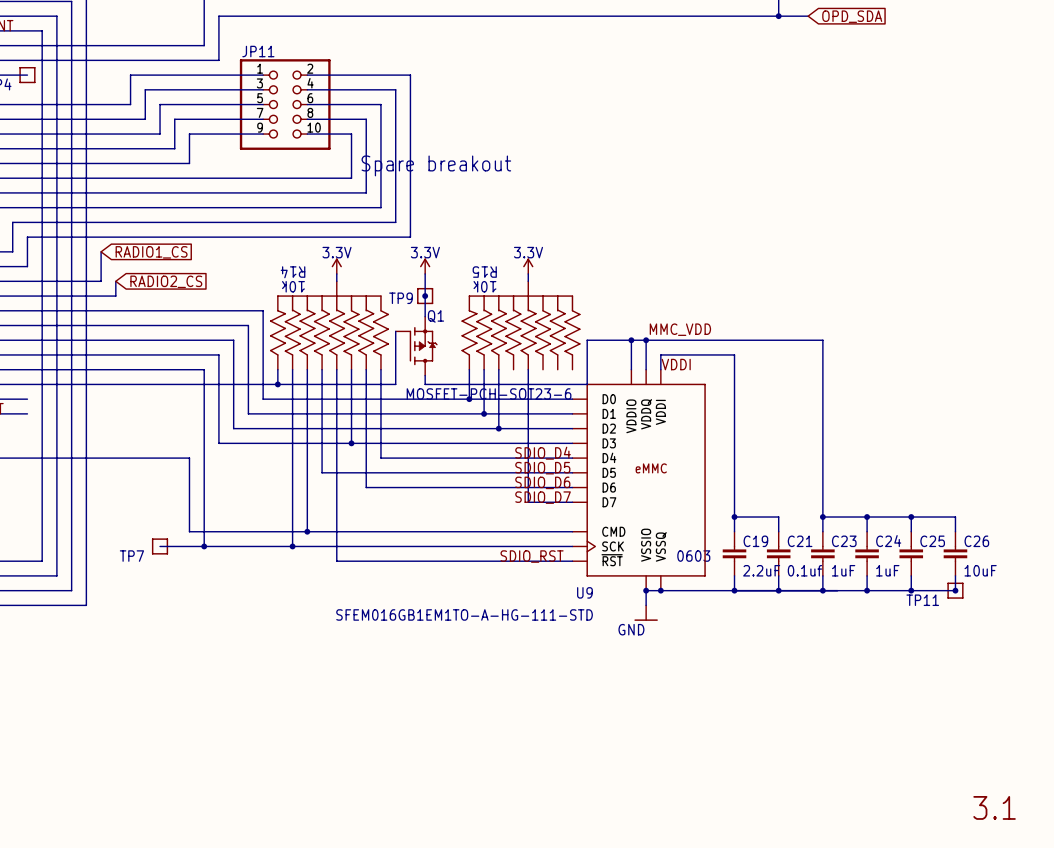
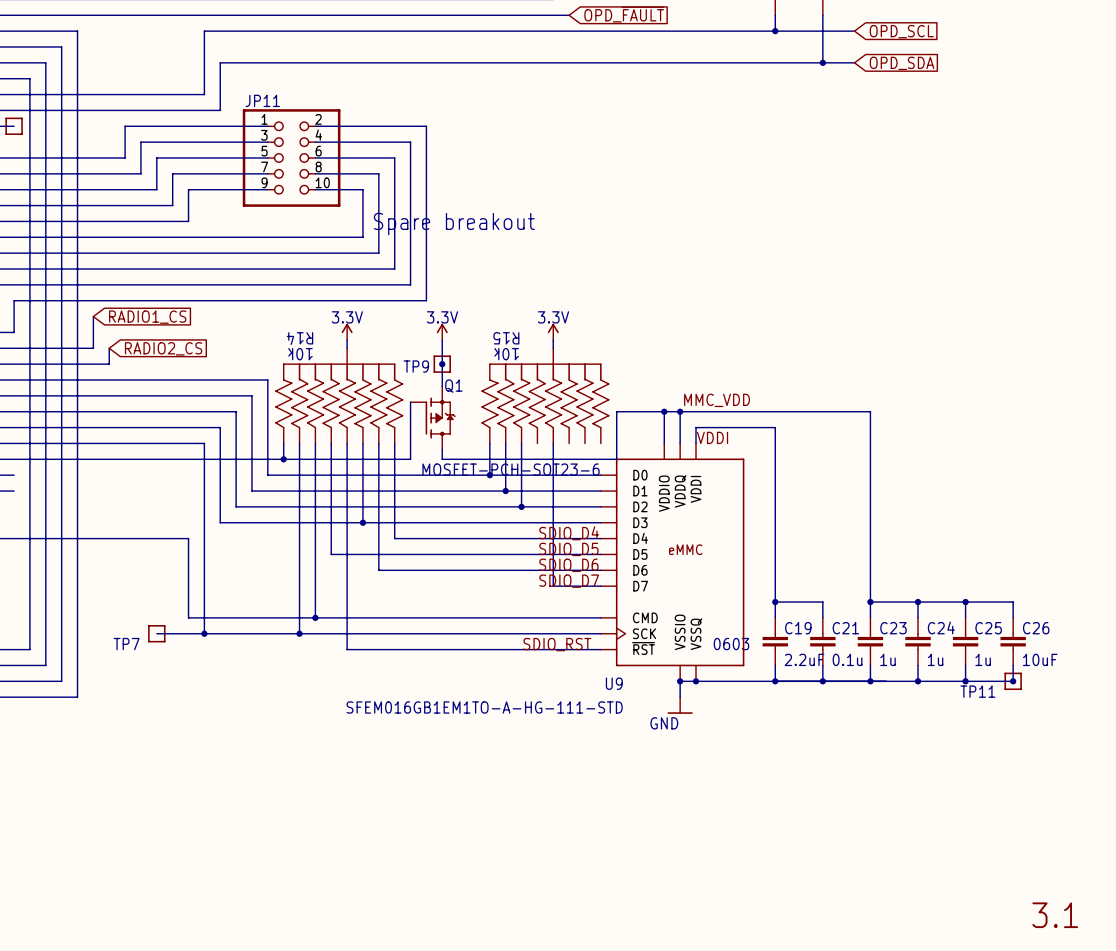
C21 value: 0.1uf (804, 570) -> 0.1u (847, 659)
C23 value: 1uF (843, 570) -> 1u (887, 659)
C24 value: 1uF (887, 570) -> 1u (935, 659)
C25 value: none -> 1u (983, 659)

